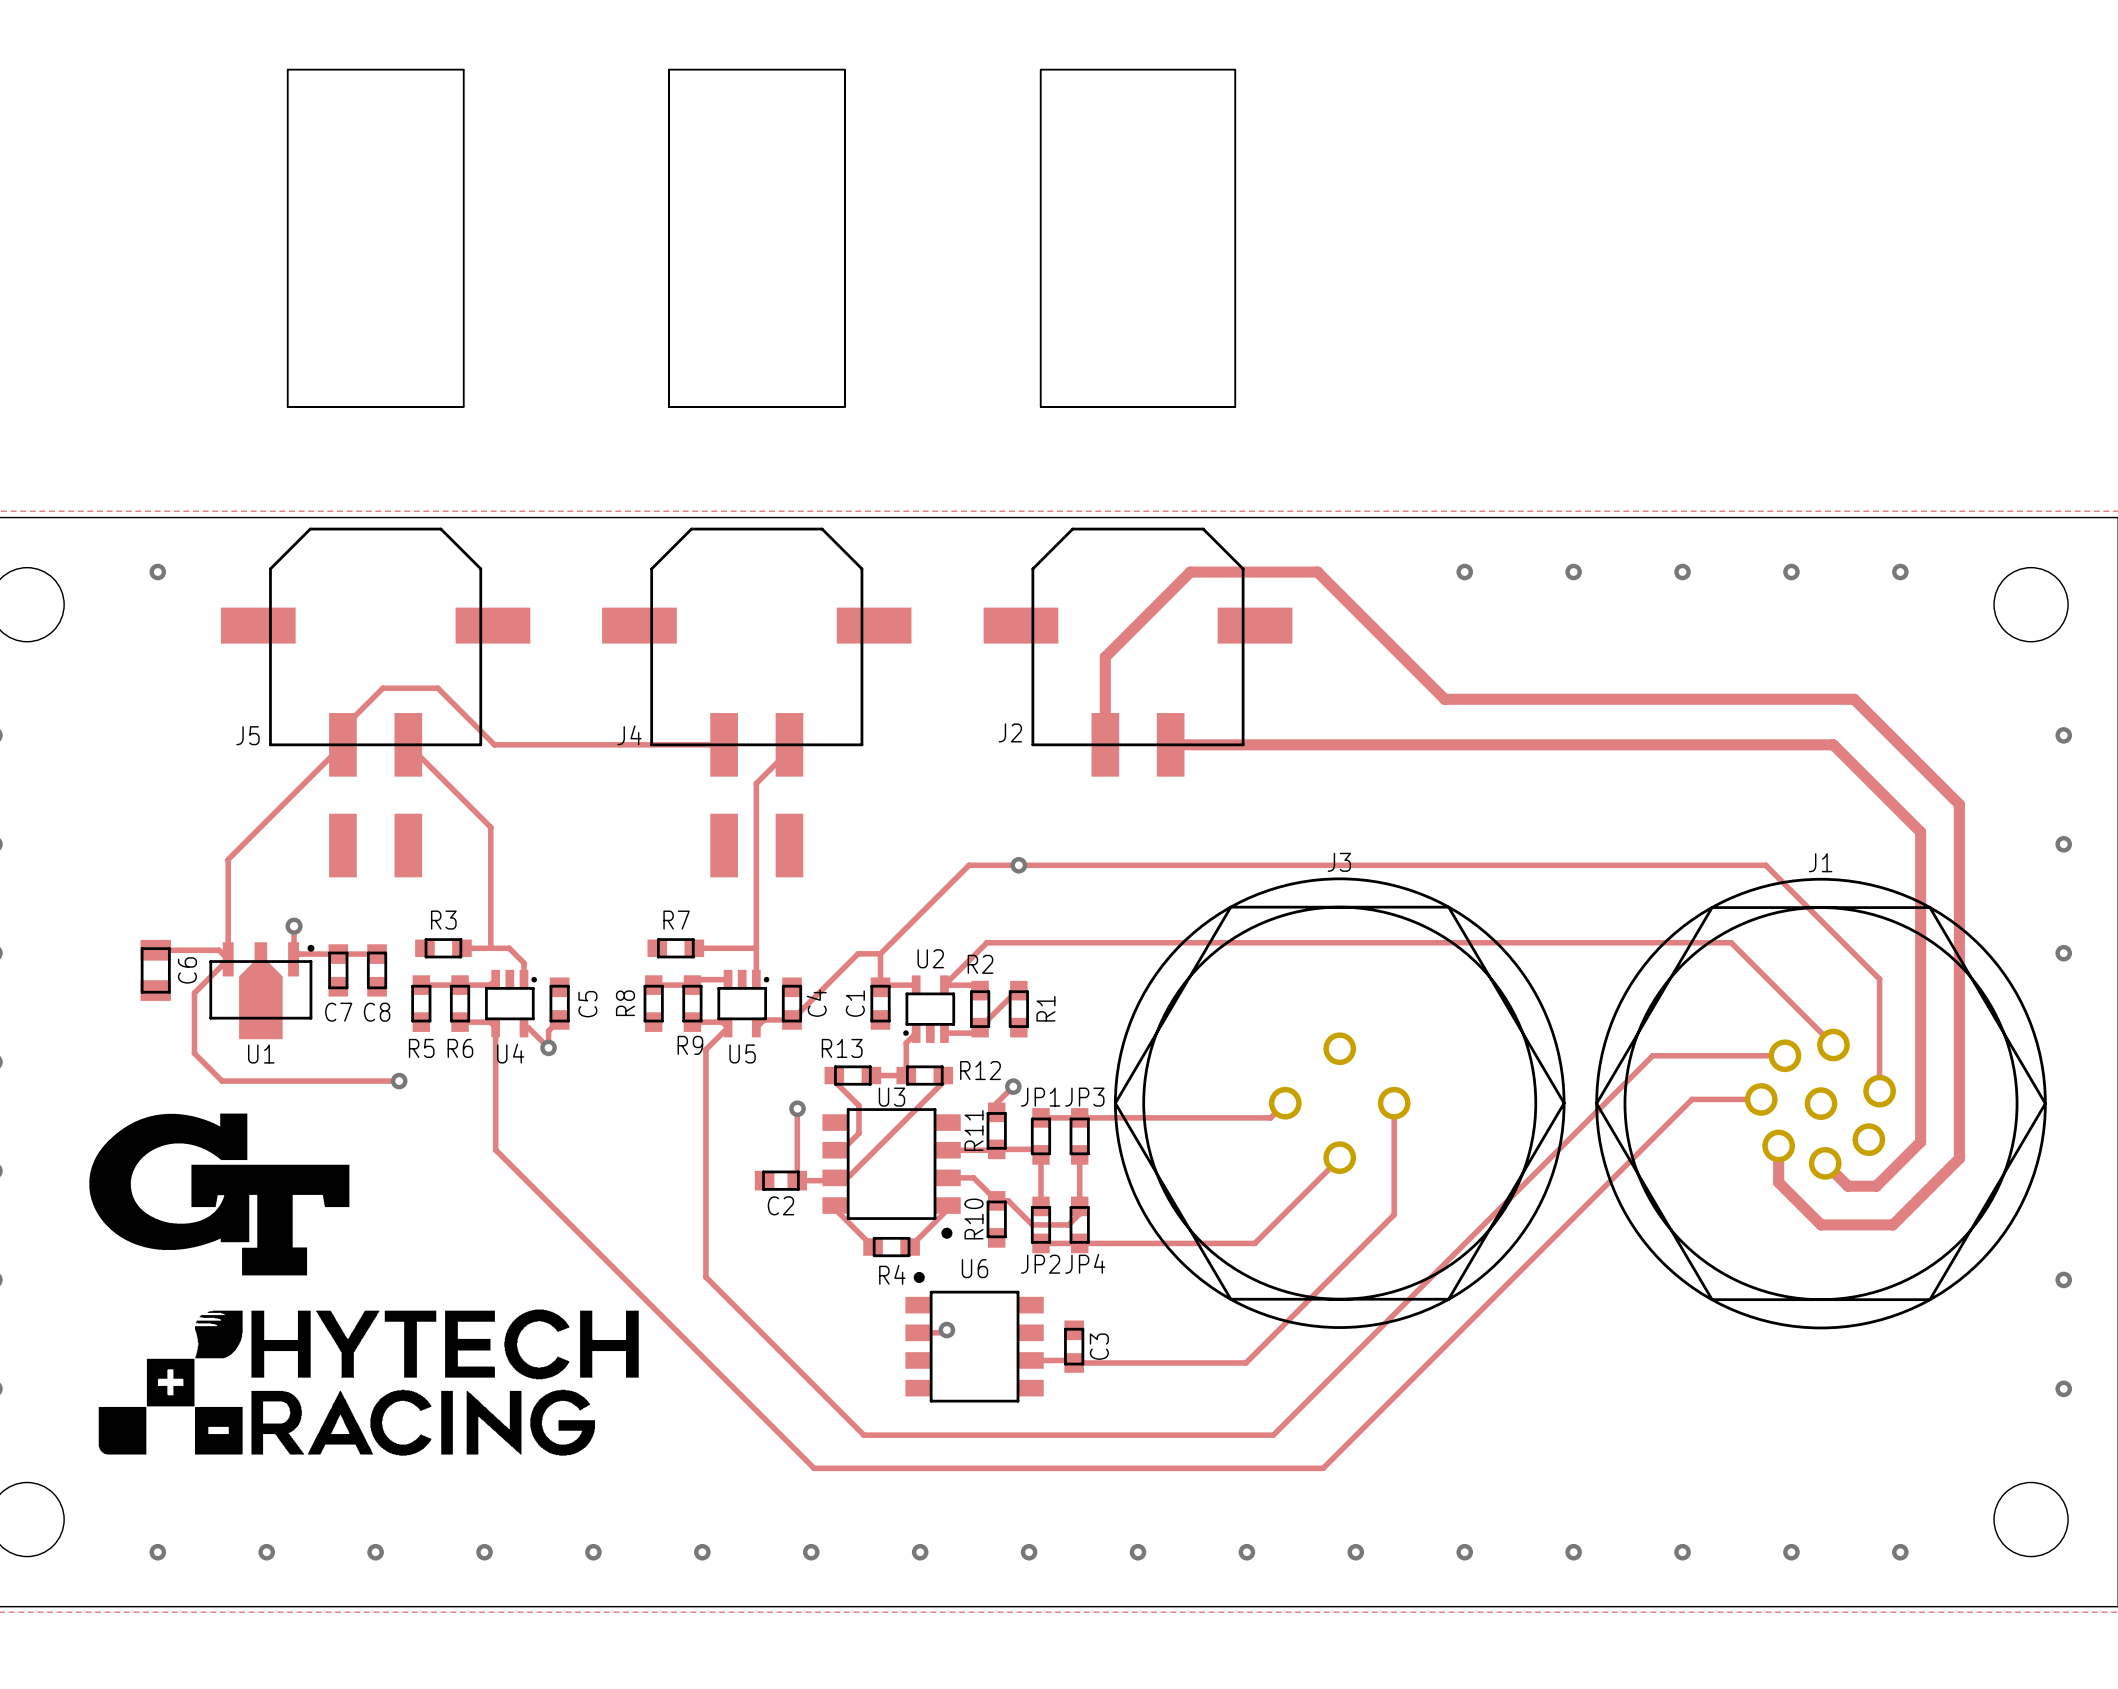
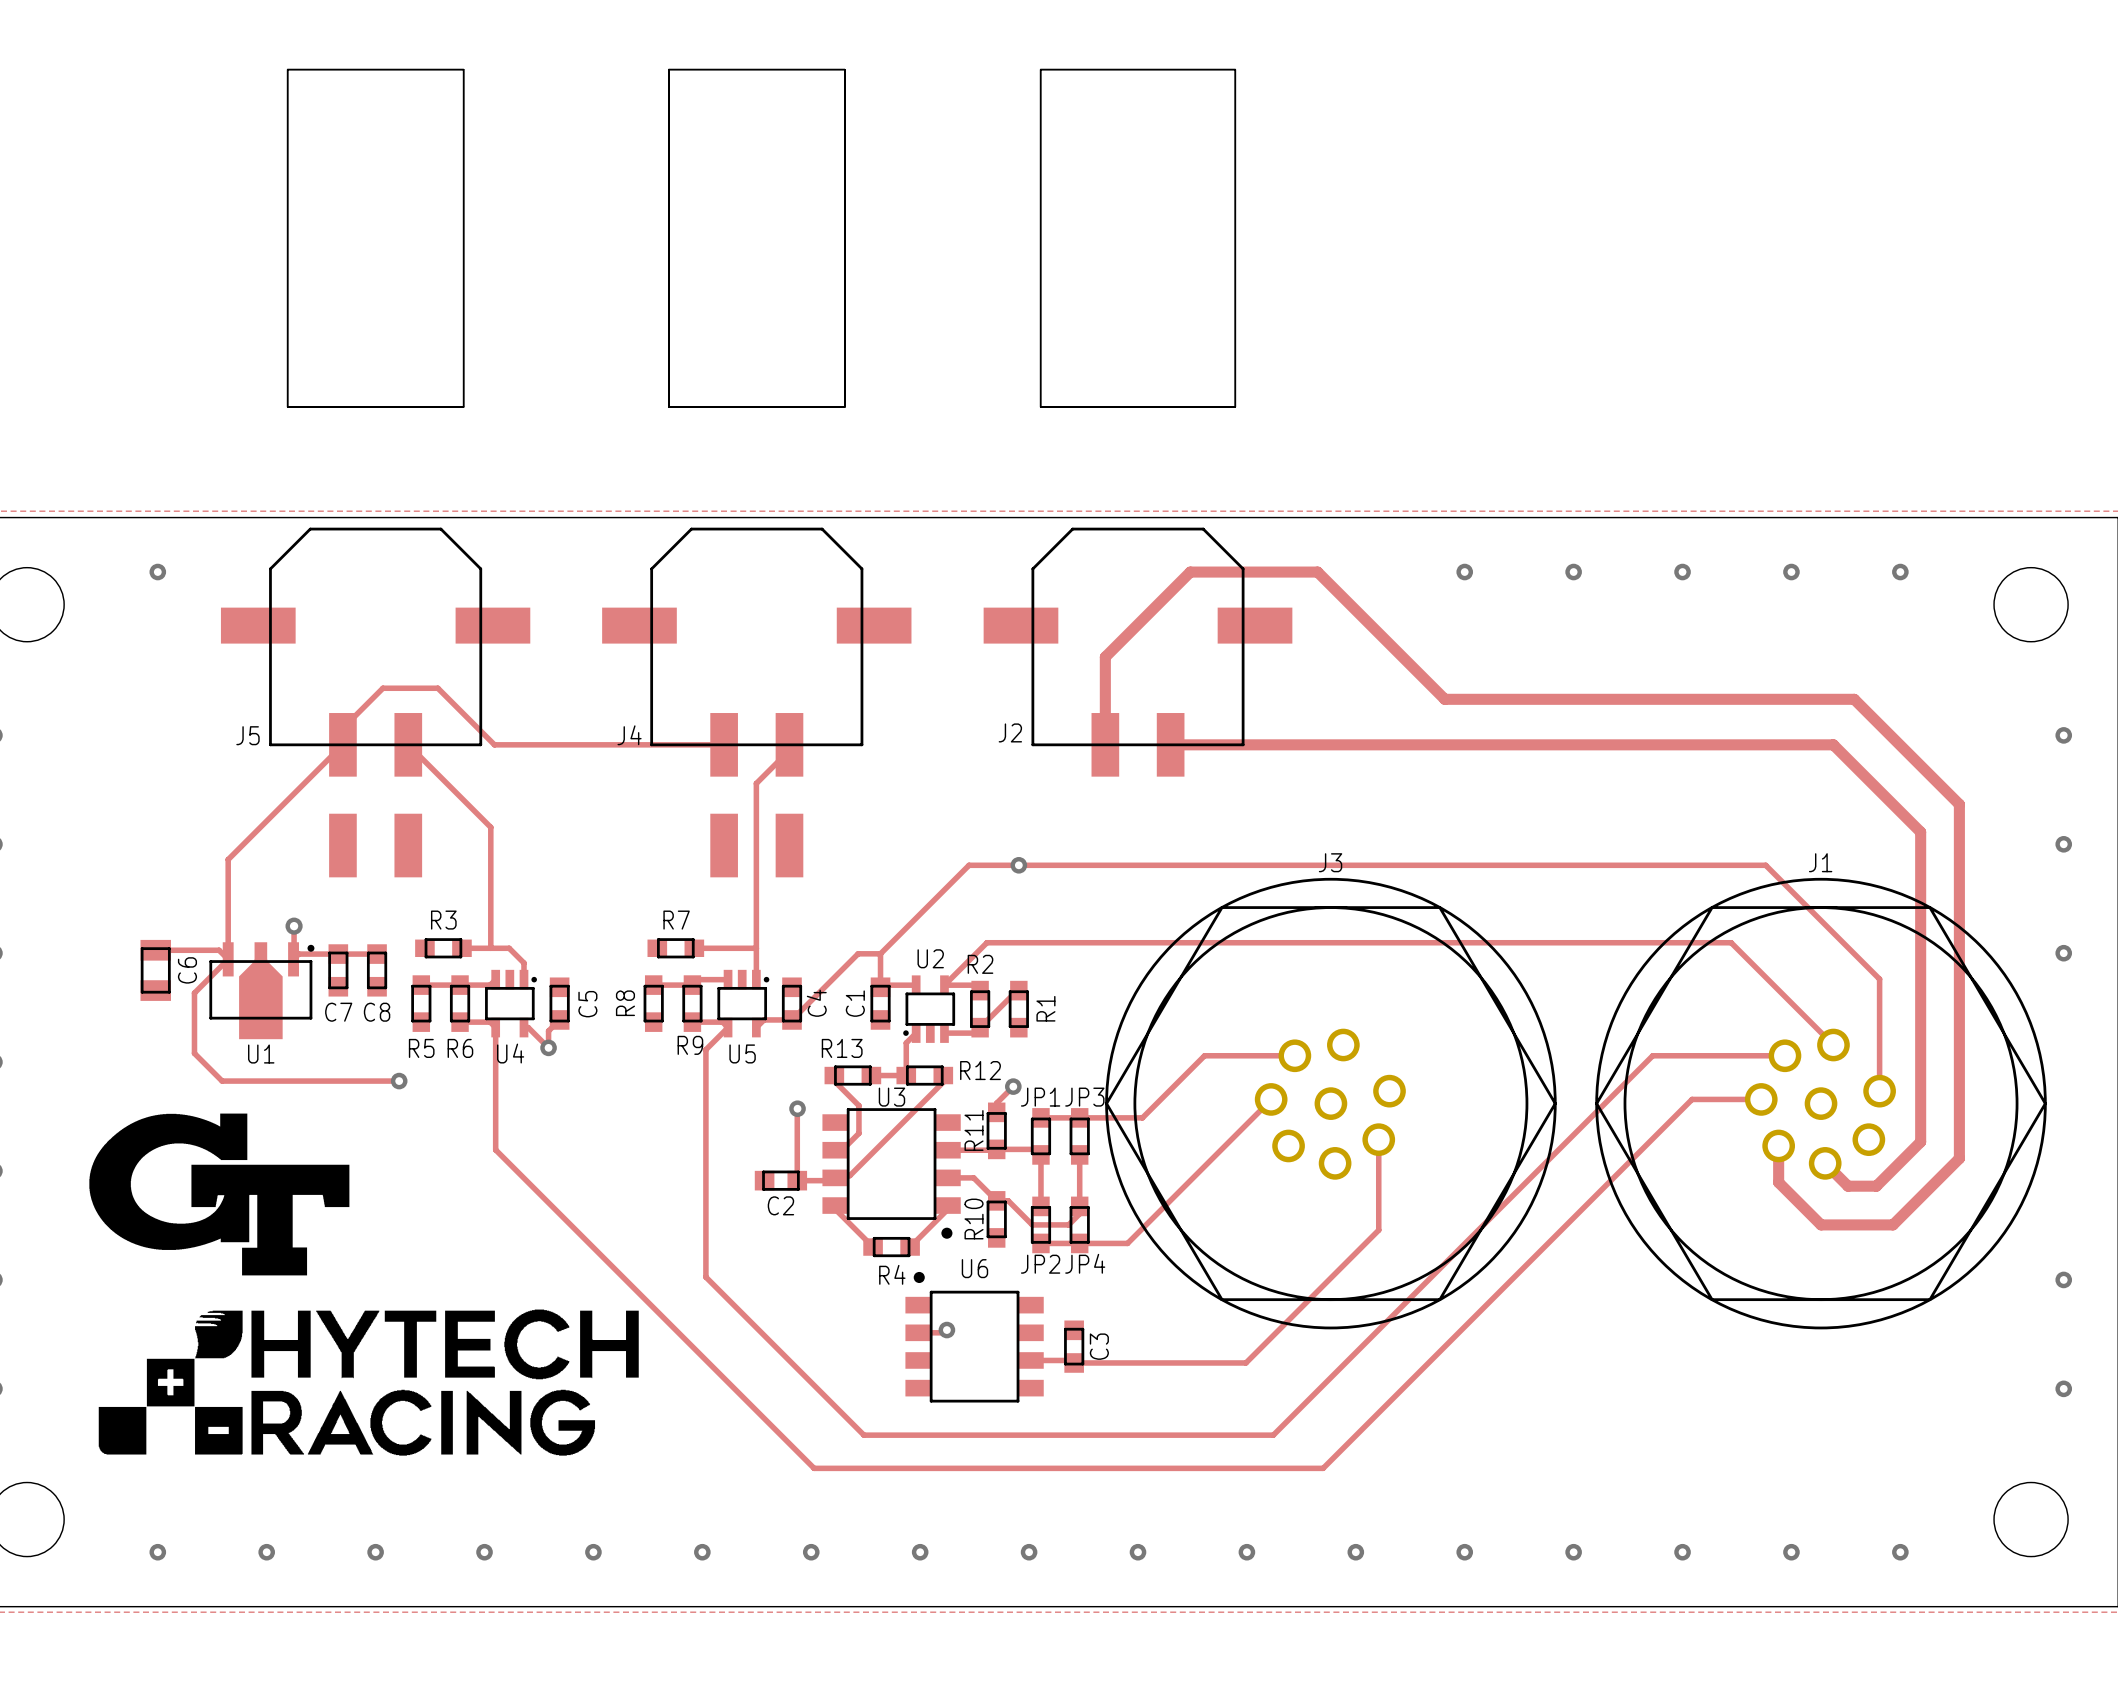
J3 footprint: [1114, 877, 1566, 1329] -> [1105, 877, 1557, 1330]
track: (1285, 1103) (1270, 1117) (1142, 1117) -> (1294, 1055) (1204, 1055) (1142, 1117)
track: (1394, 1103) (1394, 1214) (1378, 1230) -> (1378, 1139) (1378, 1230)
track: (1339, 1157) (1254, 1243) (1127, 1243) -> (1271, 1099) (1127, 1243)

